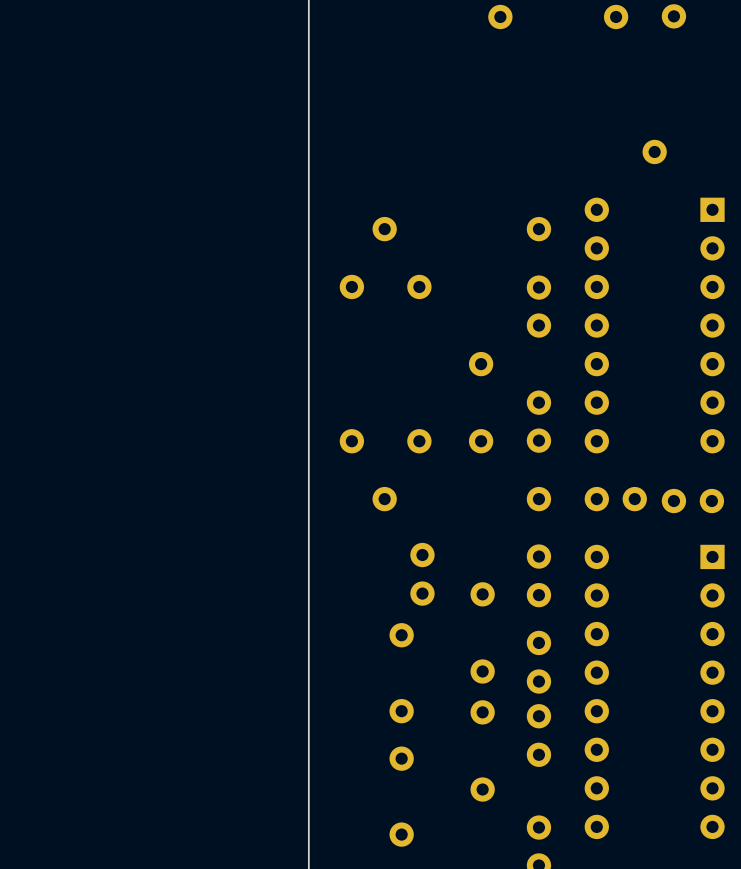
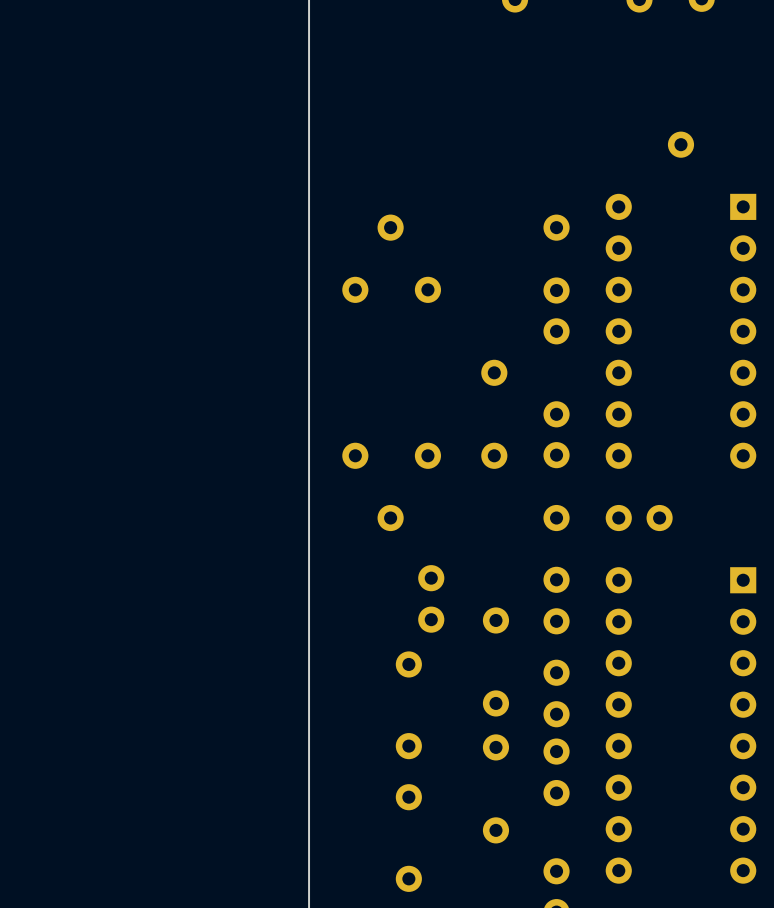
part: (692, 501) -> none

